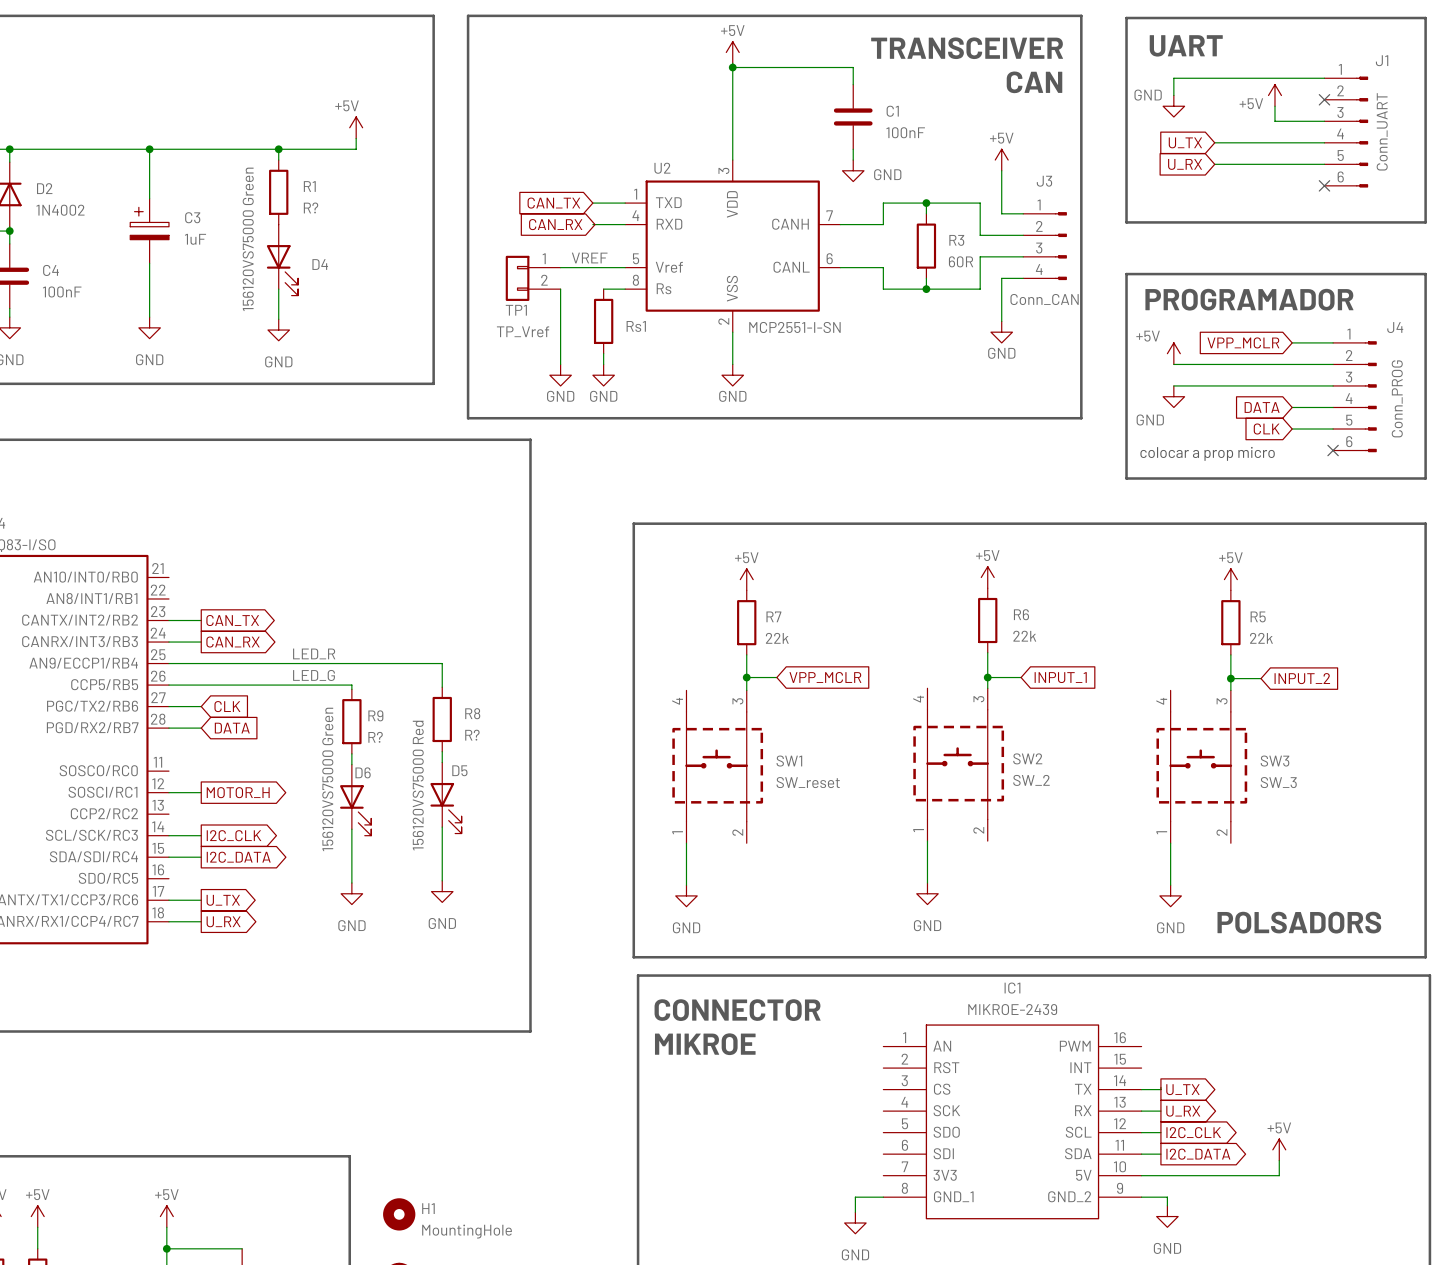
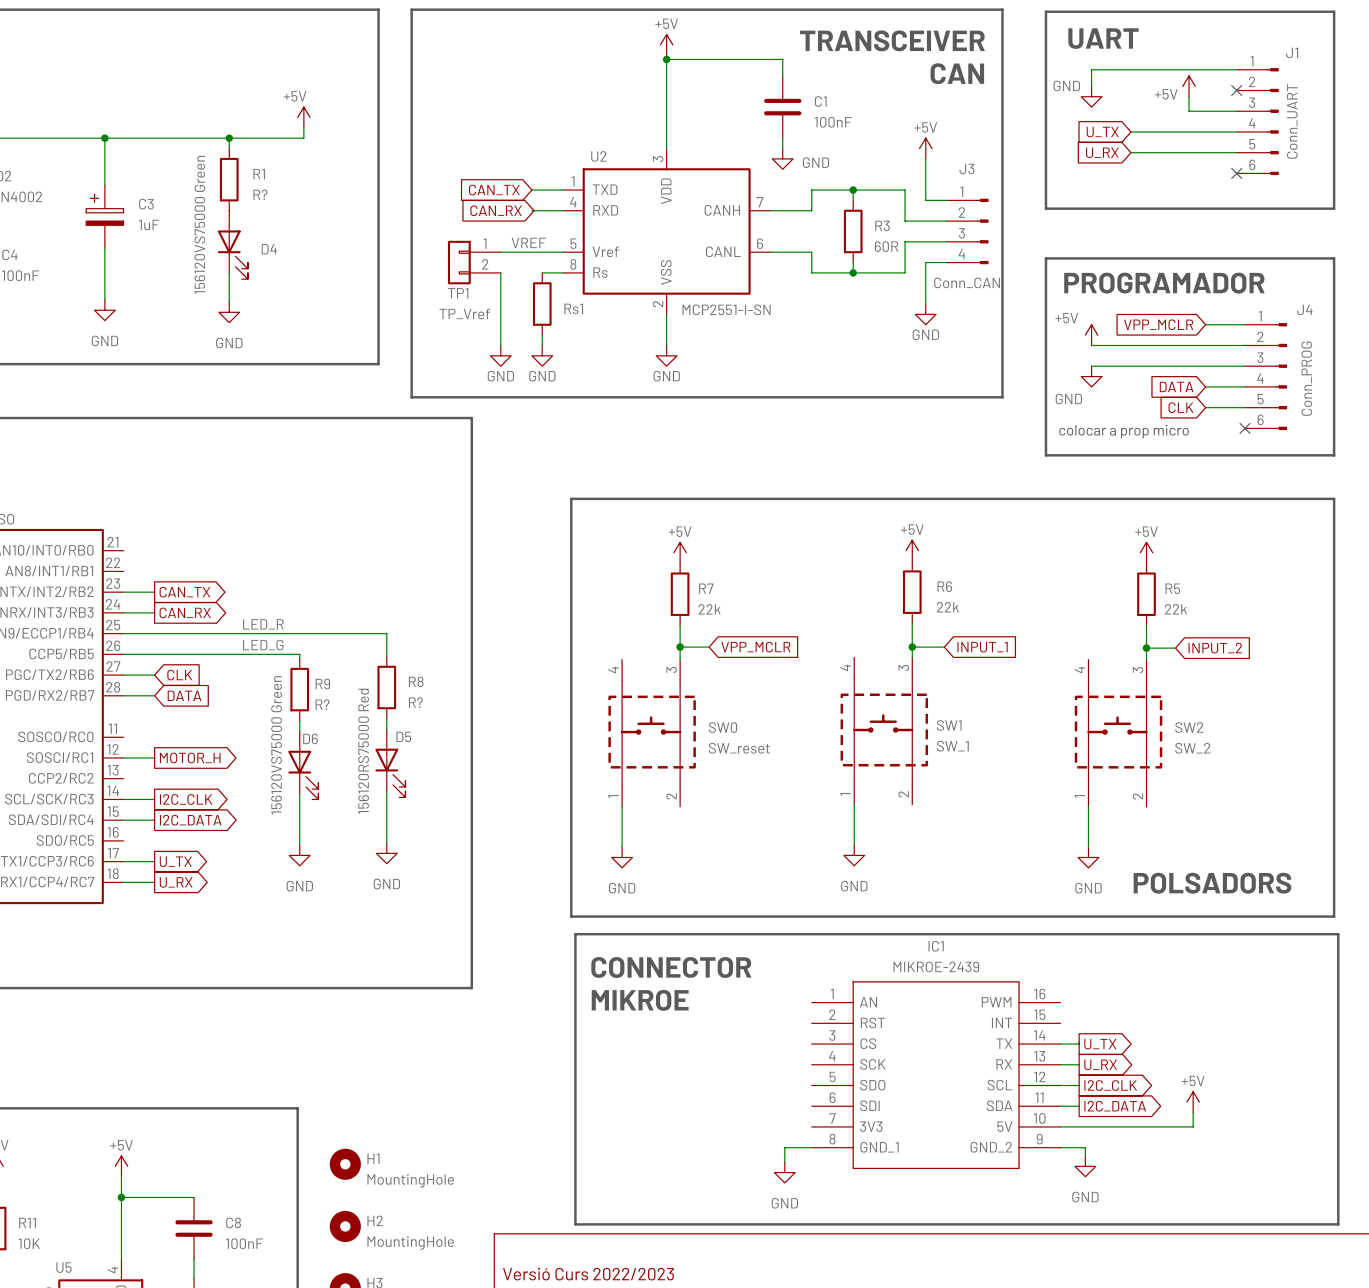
SW2 name: SW2 (1027, 758) -> SW1 (949, 725)
SW1 name: SW1 (789, 761) -> SW0 (722, 727)
SW3 name: SW3 (1275, 761) -> SW2 (1189, 727)
SW2 value: SW_2 (1031, 780) -> SW_1 (952, 746)
SW3 value: SW_3 (1278, 782) -> SW_2 (1192, 748)
D5 value: 156120VS75000 Red (418, 785) -> 156120RS75000 Red (363, 751)

